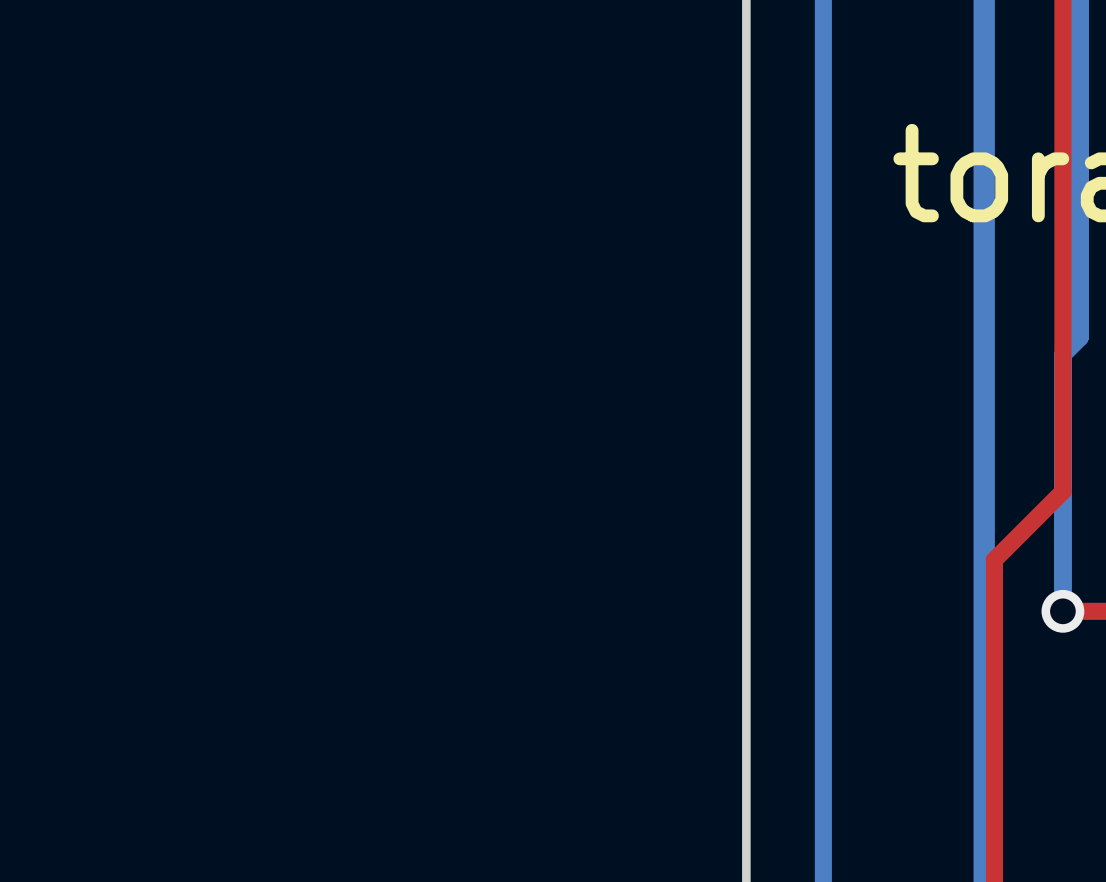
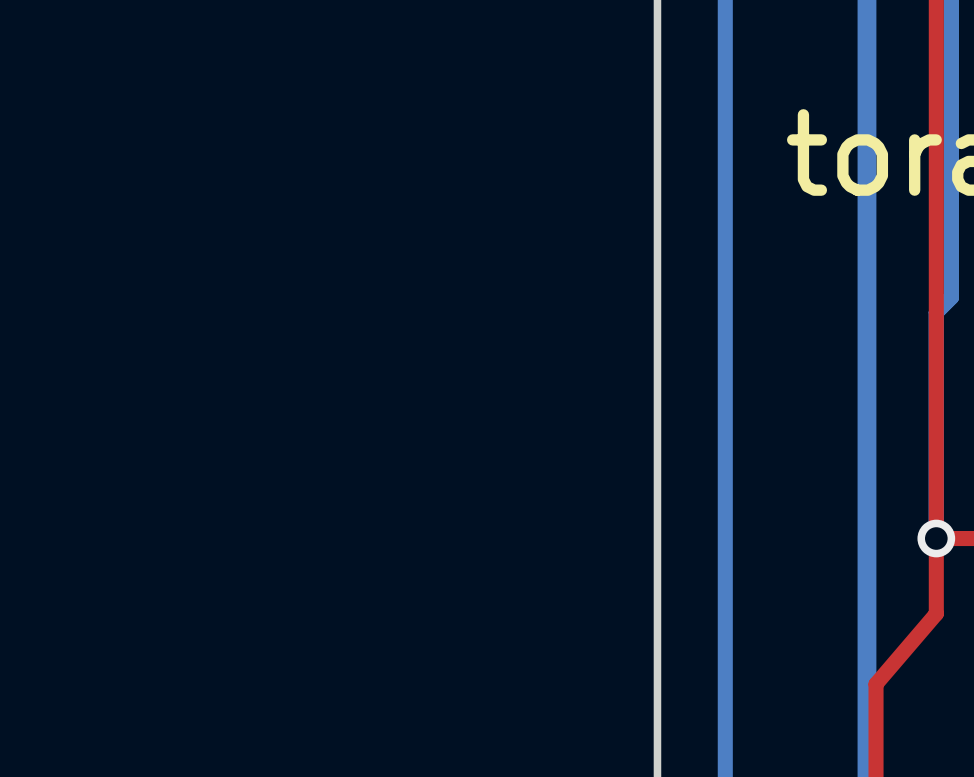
top track: (1062, 491) (994, 560) (994, 776) -> (936, 433) (936, 613) (876, 684)

